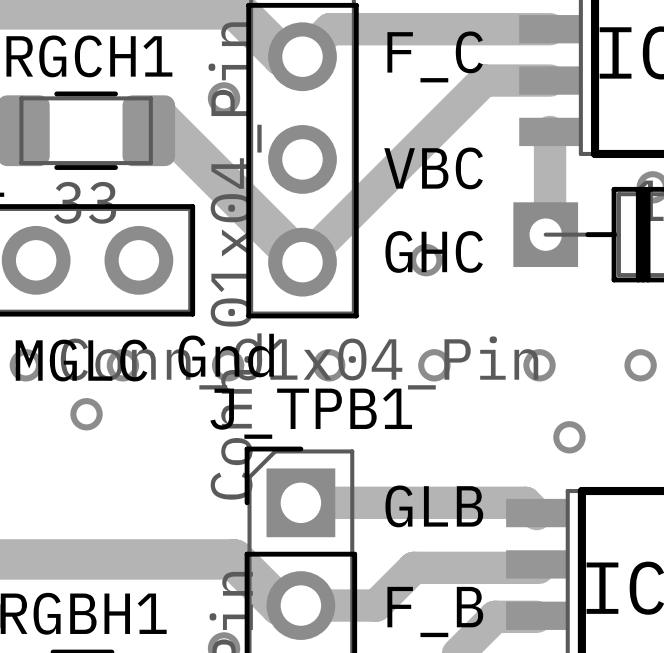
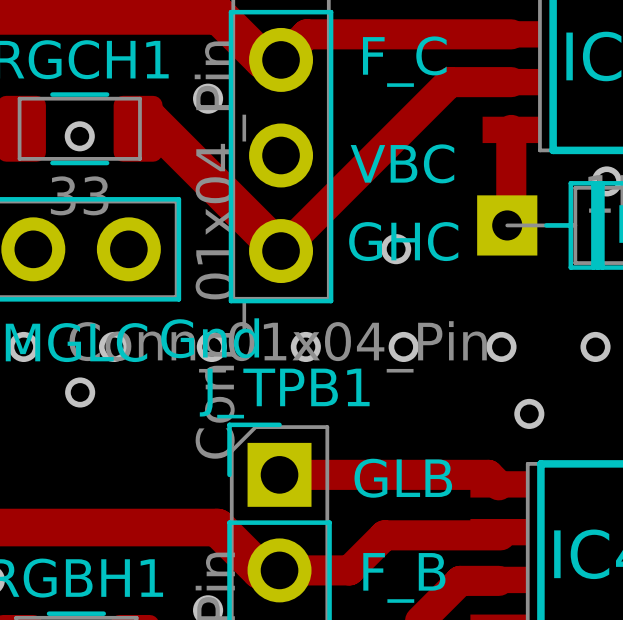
via: none -> (79, 136)

